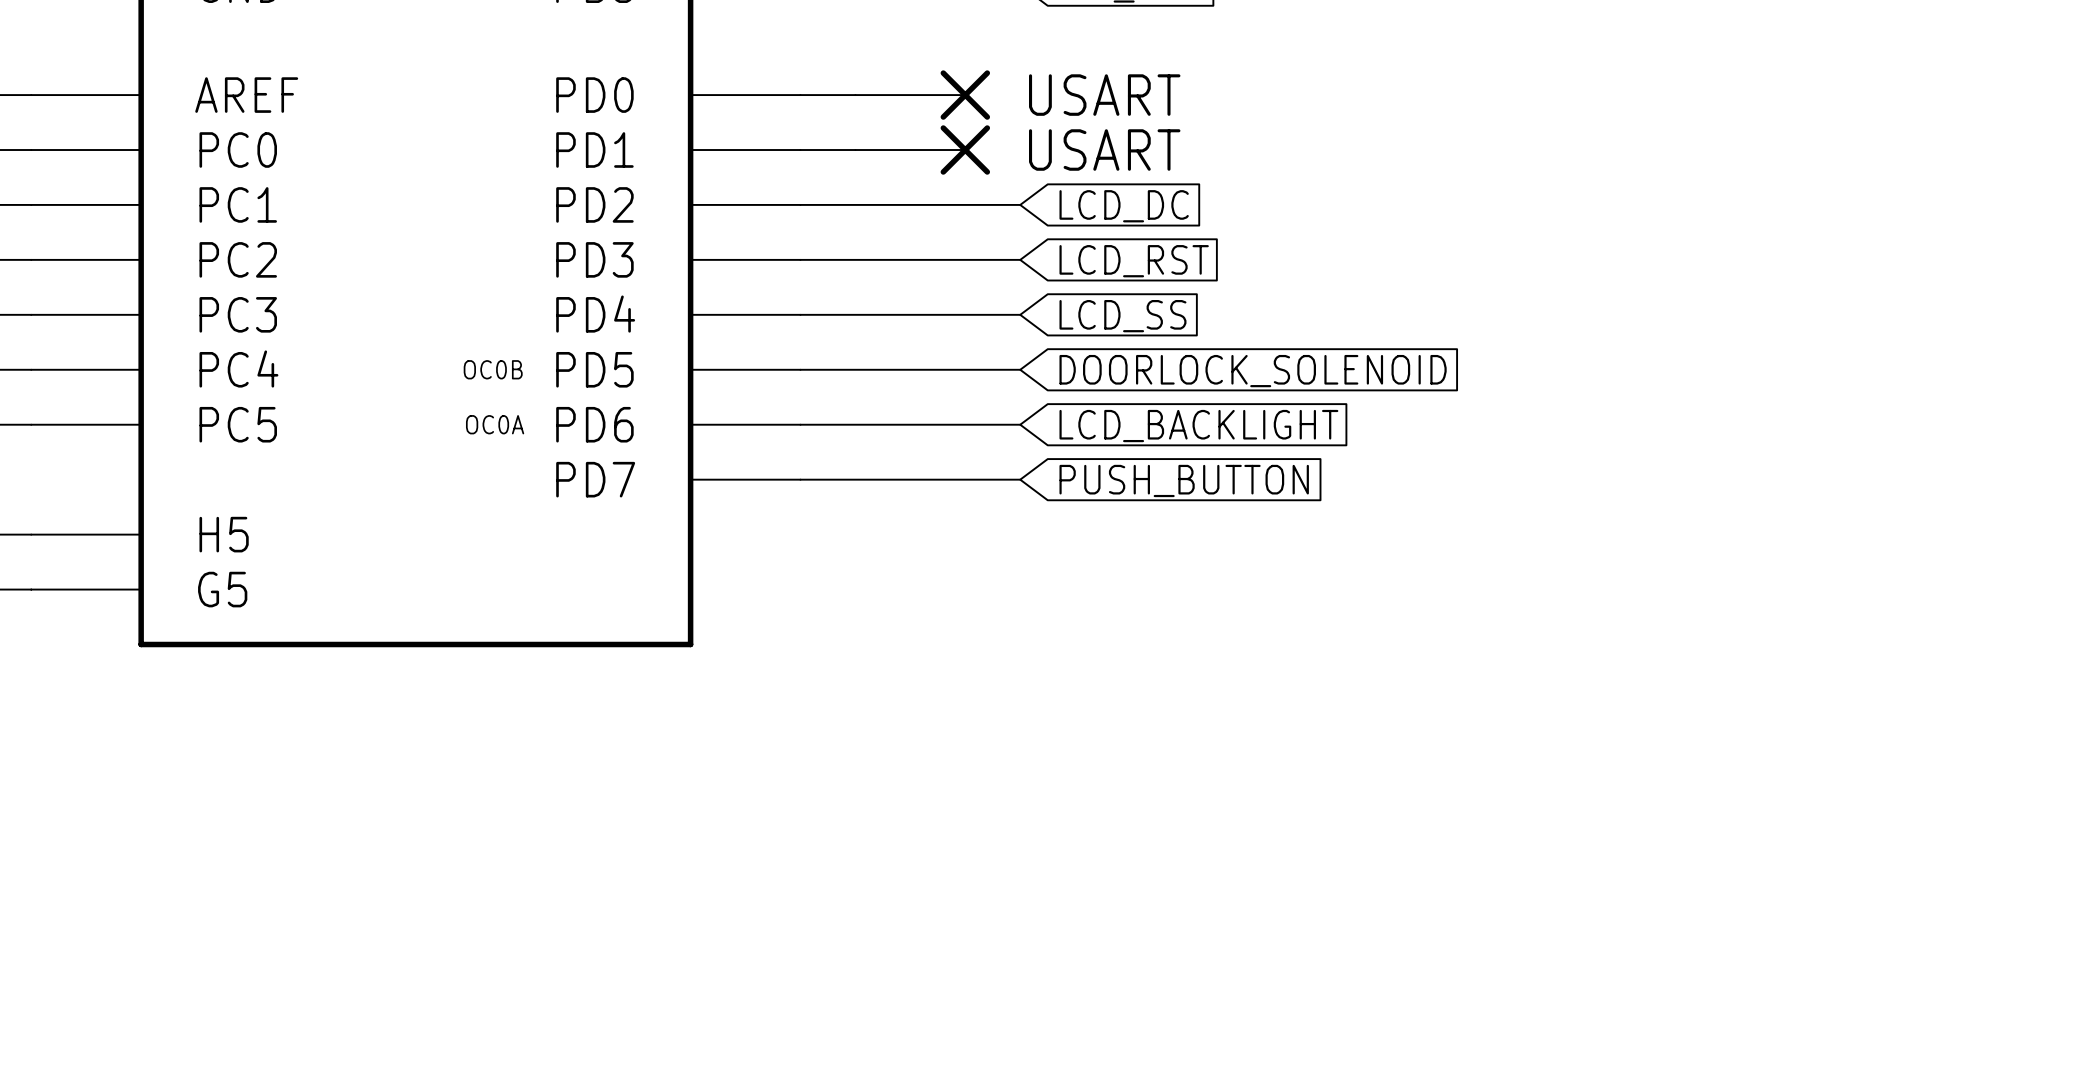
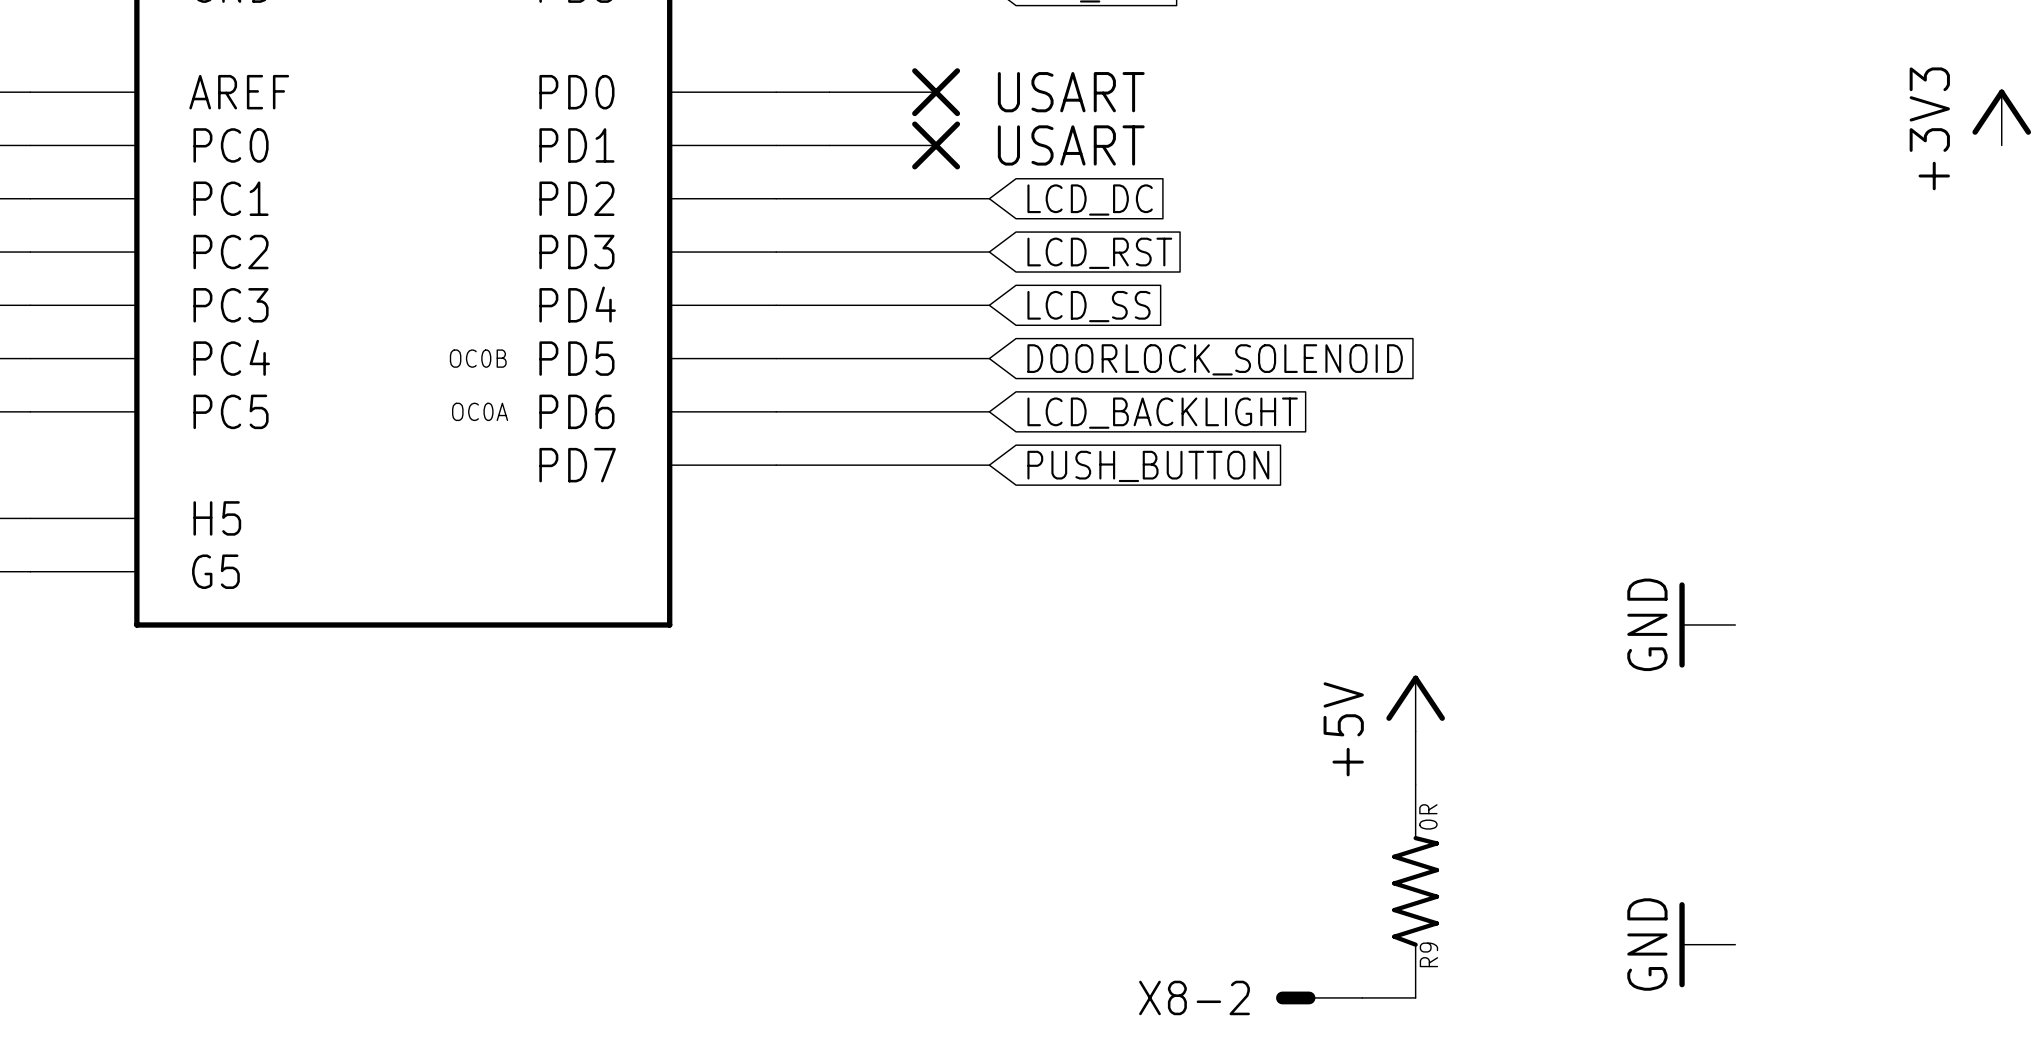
power symbol: none -> +3V3 (2001, 117)
power symbol: none -> GND (1707, 624)
power symbol: none -> +5V (1415, 703)
wire: none -> (1415, 731) (1415, 784)
R9: none -> 0R (1415, 891)
power symbol: none -> GND (1707, 944)
X8-2: none -> (1319, 997)
wire: none -> (1362, 997) (1415, 997)

